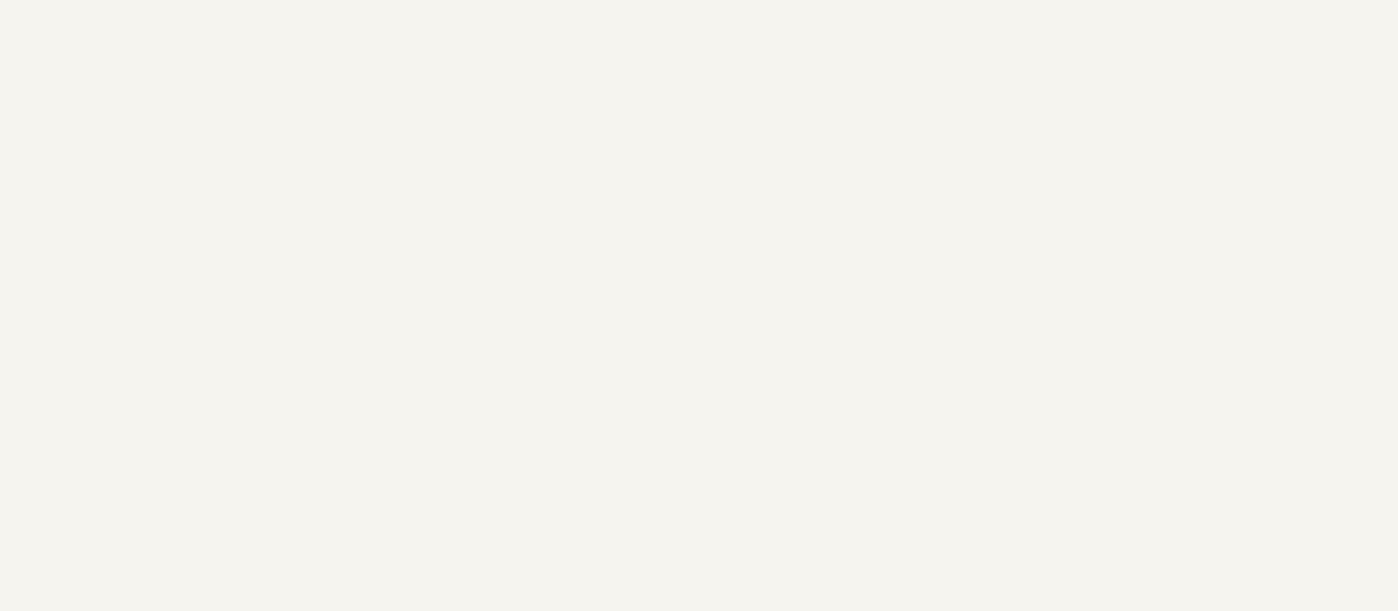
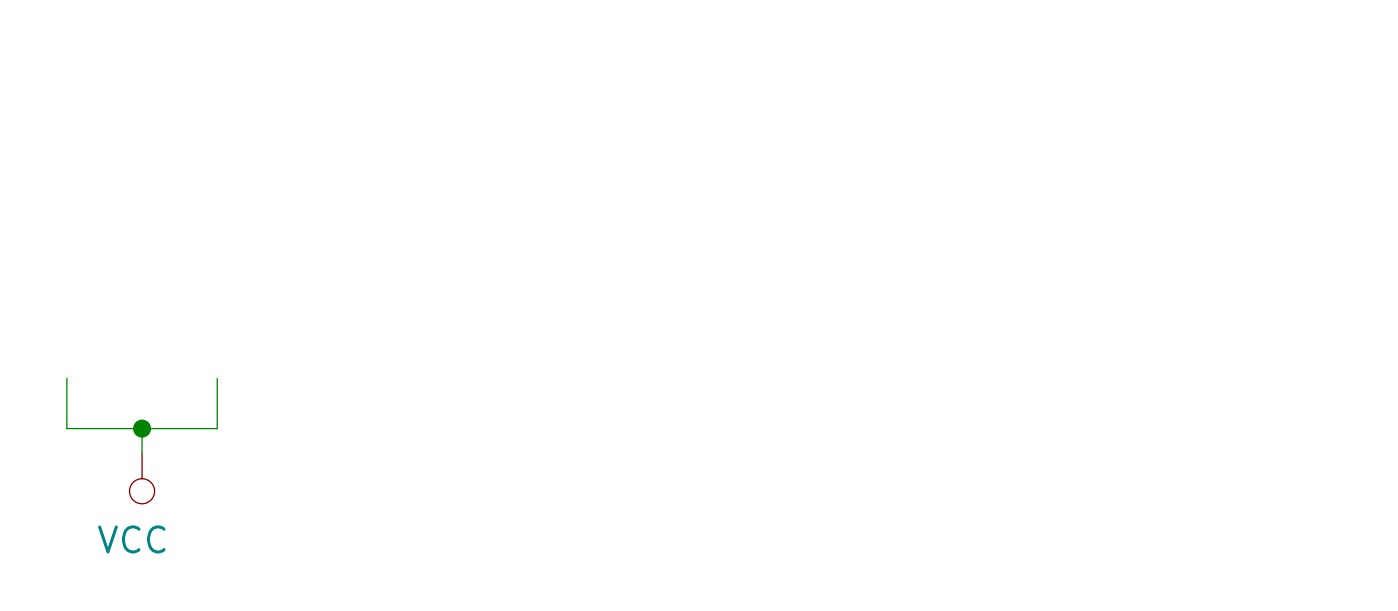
wire: none -> (66, 378) (66, 428) (217, 428) (217, 378)
wire: none -> (142, 428) (142, 453)
junction: none -> (142, 428)
power symbol: none -> VCC (142, 478)

